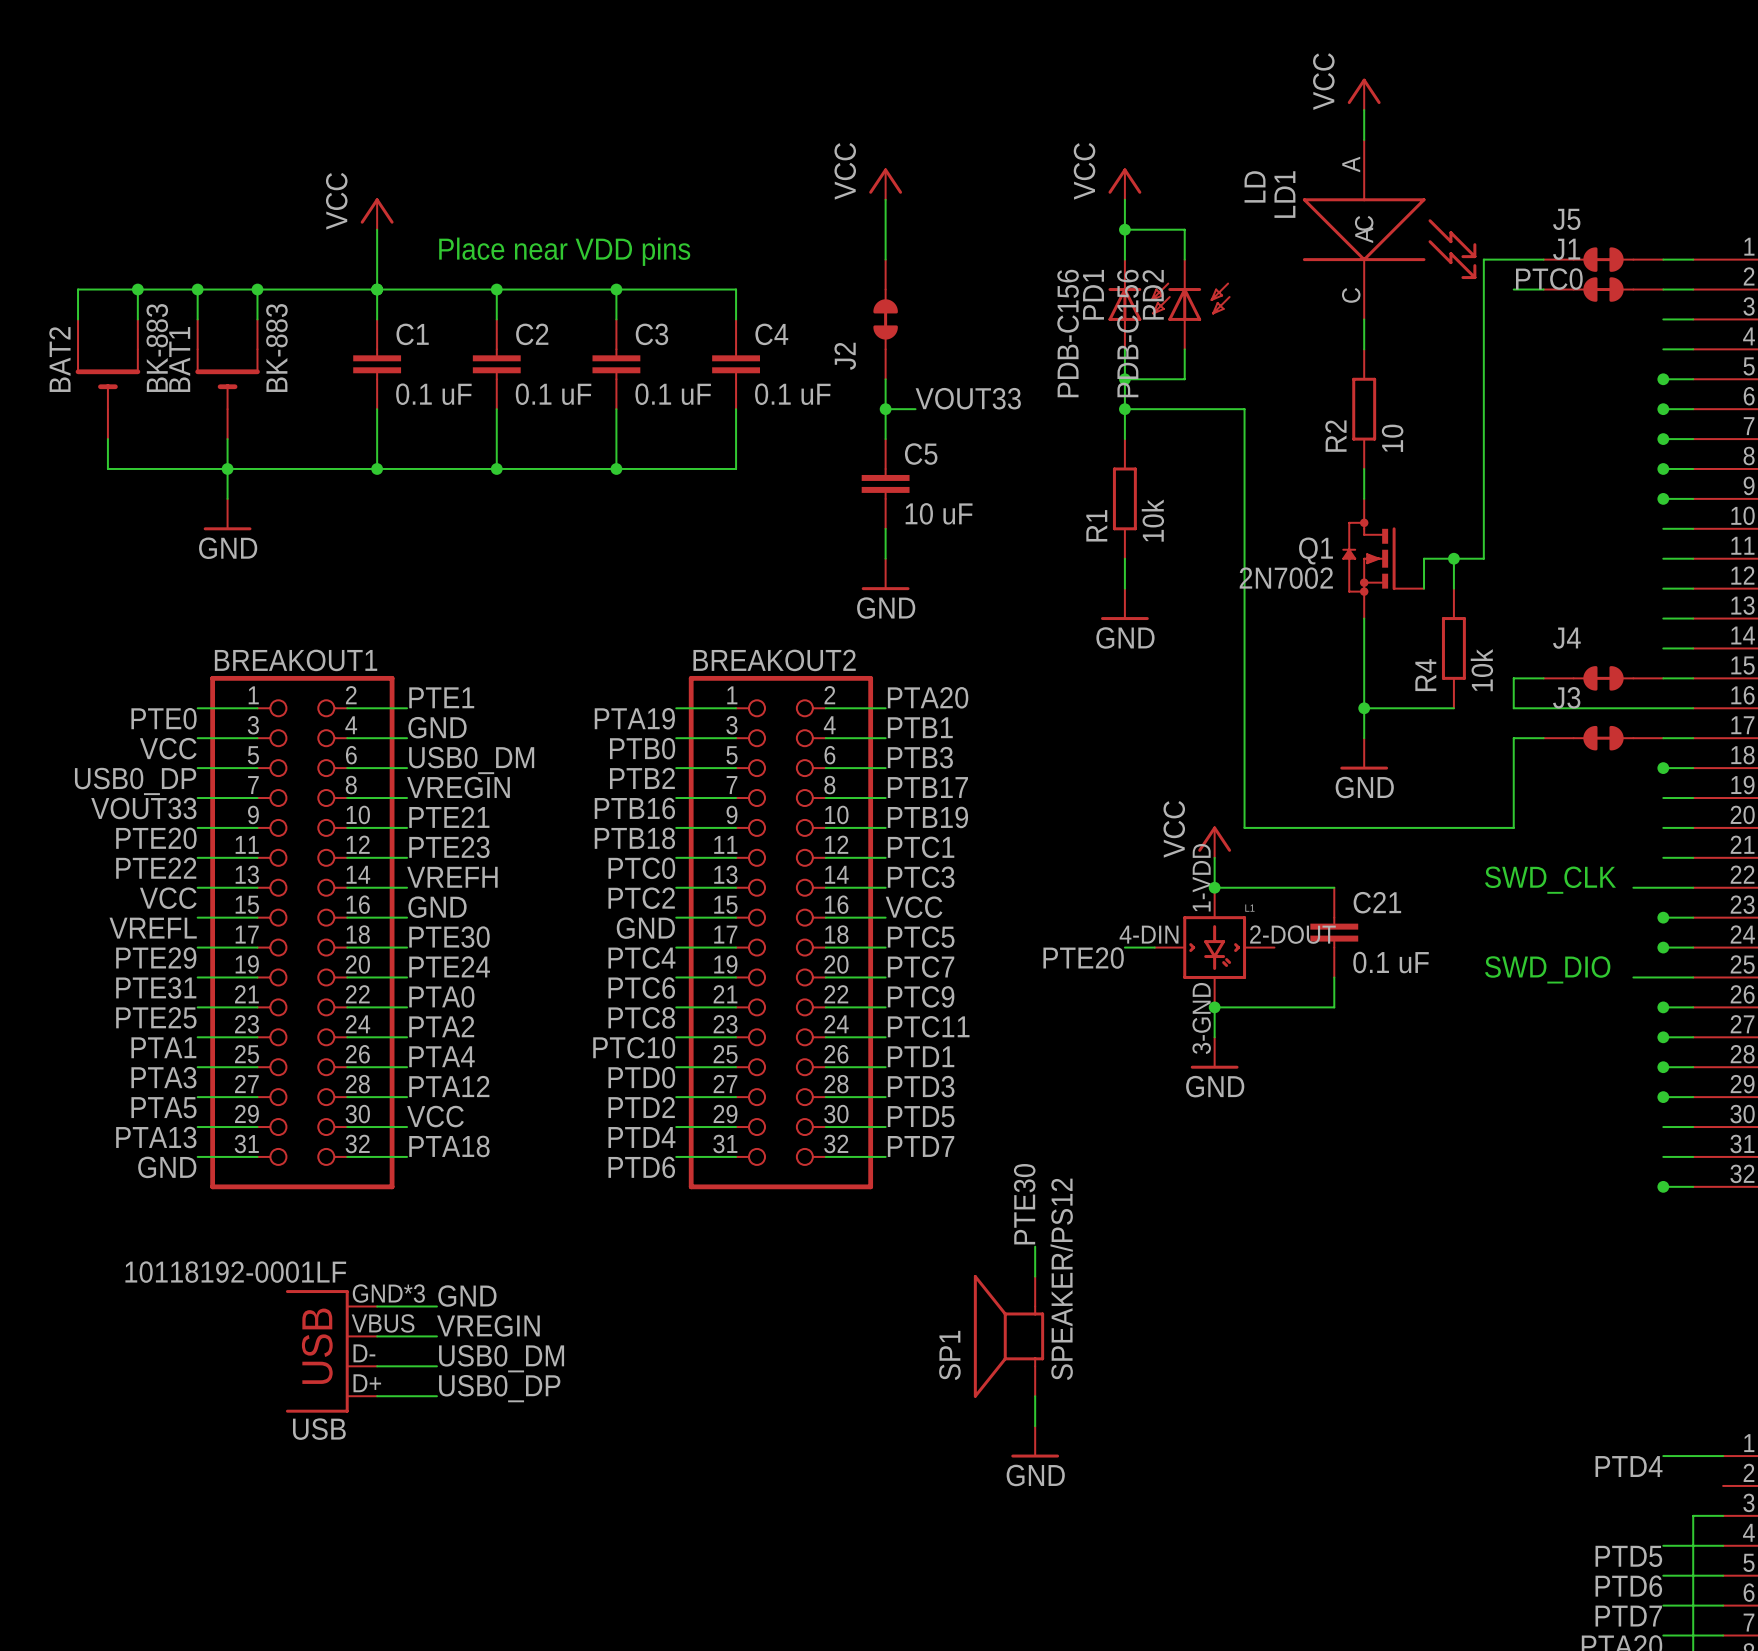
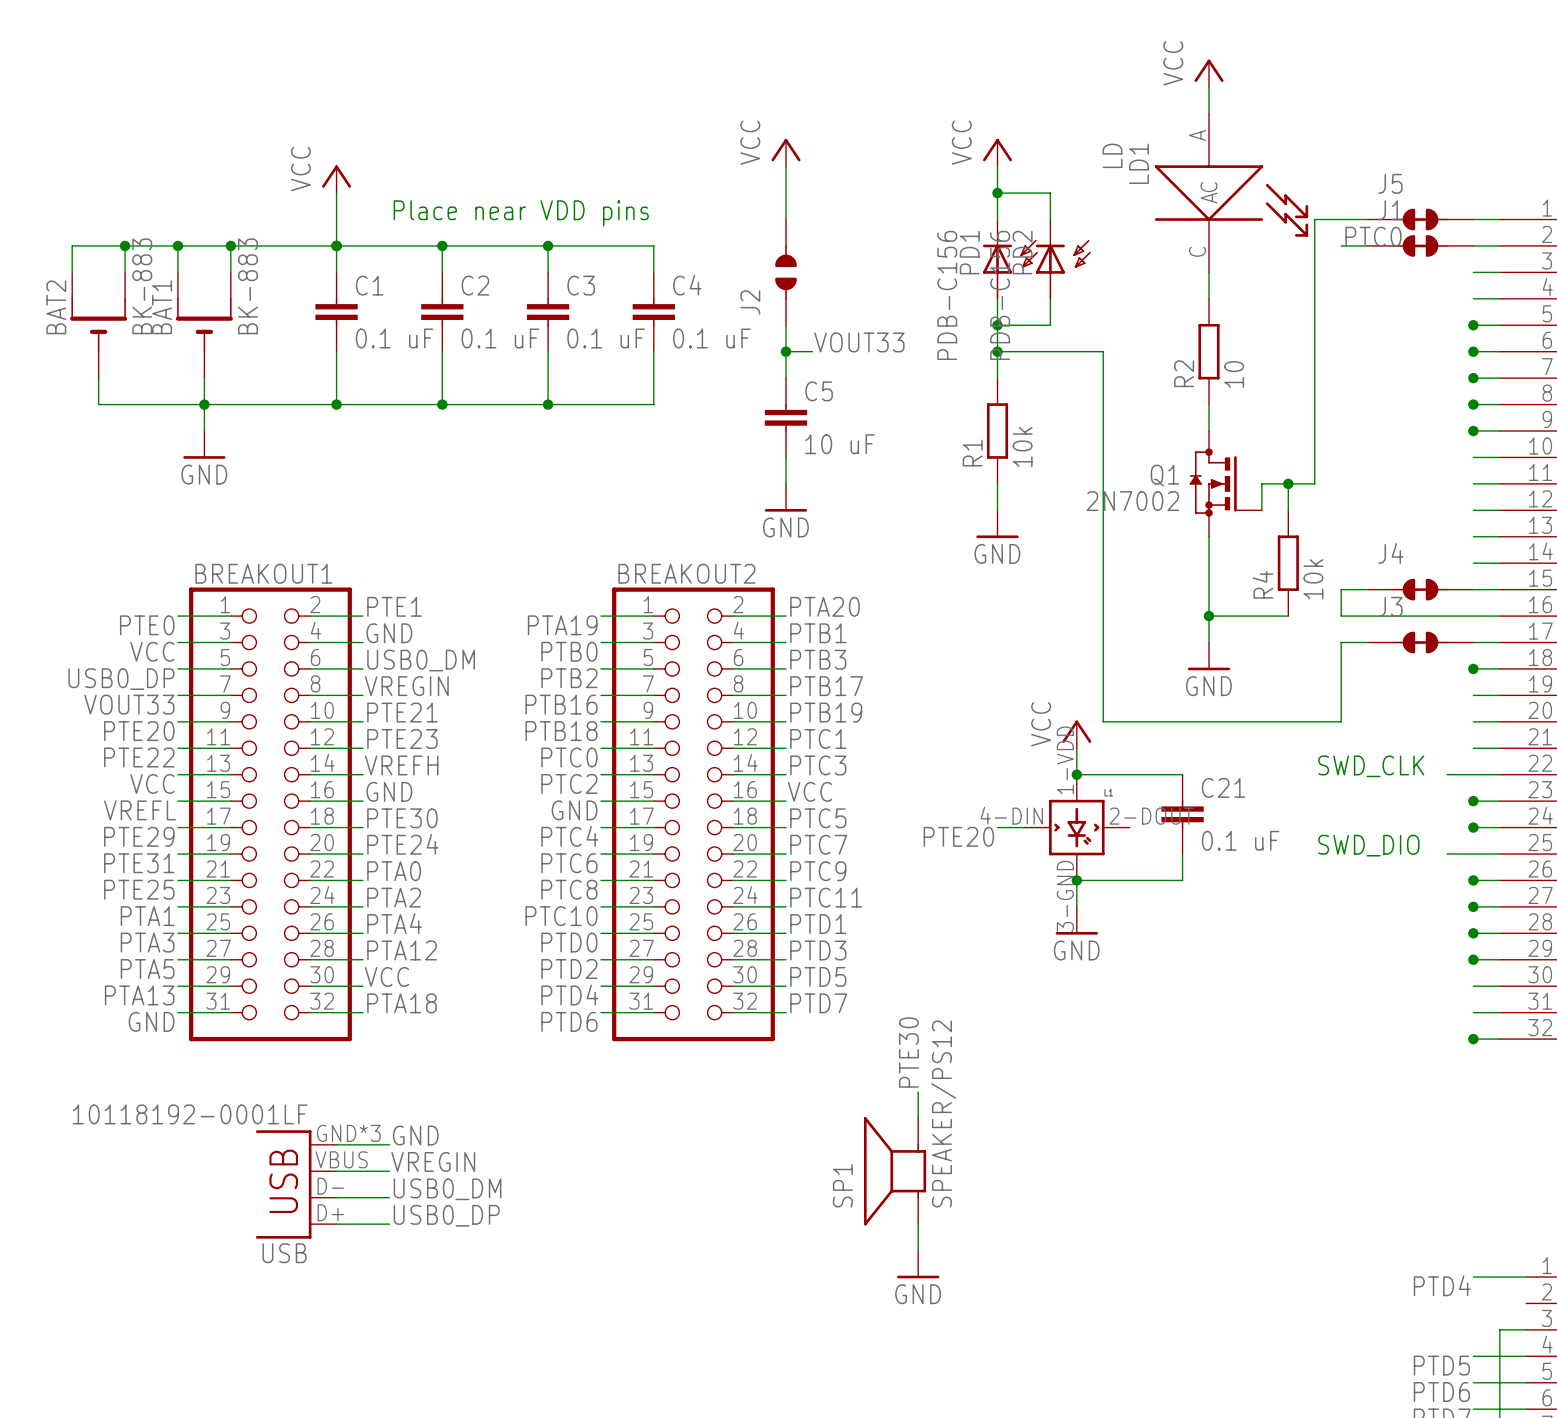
J2 symbol: [873, 259, 898, 380] -> [775, 219, 797, 326]

